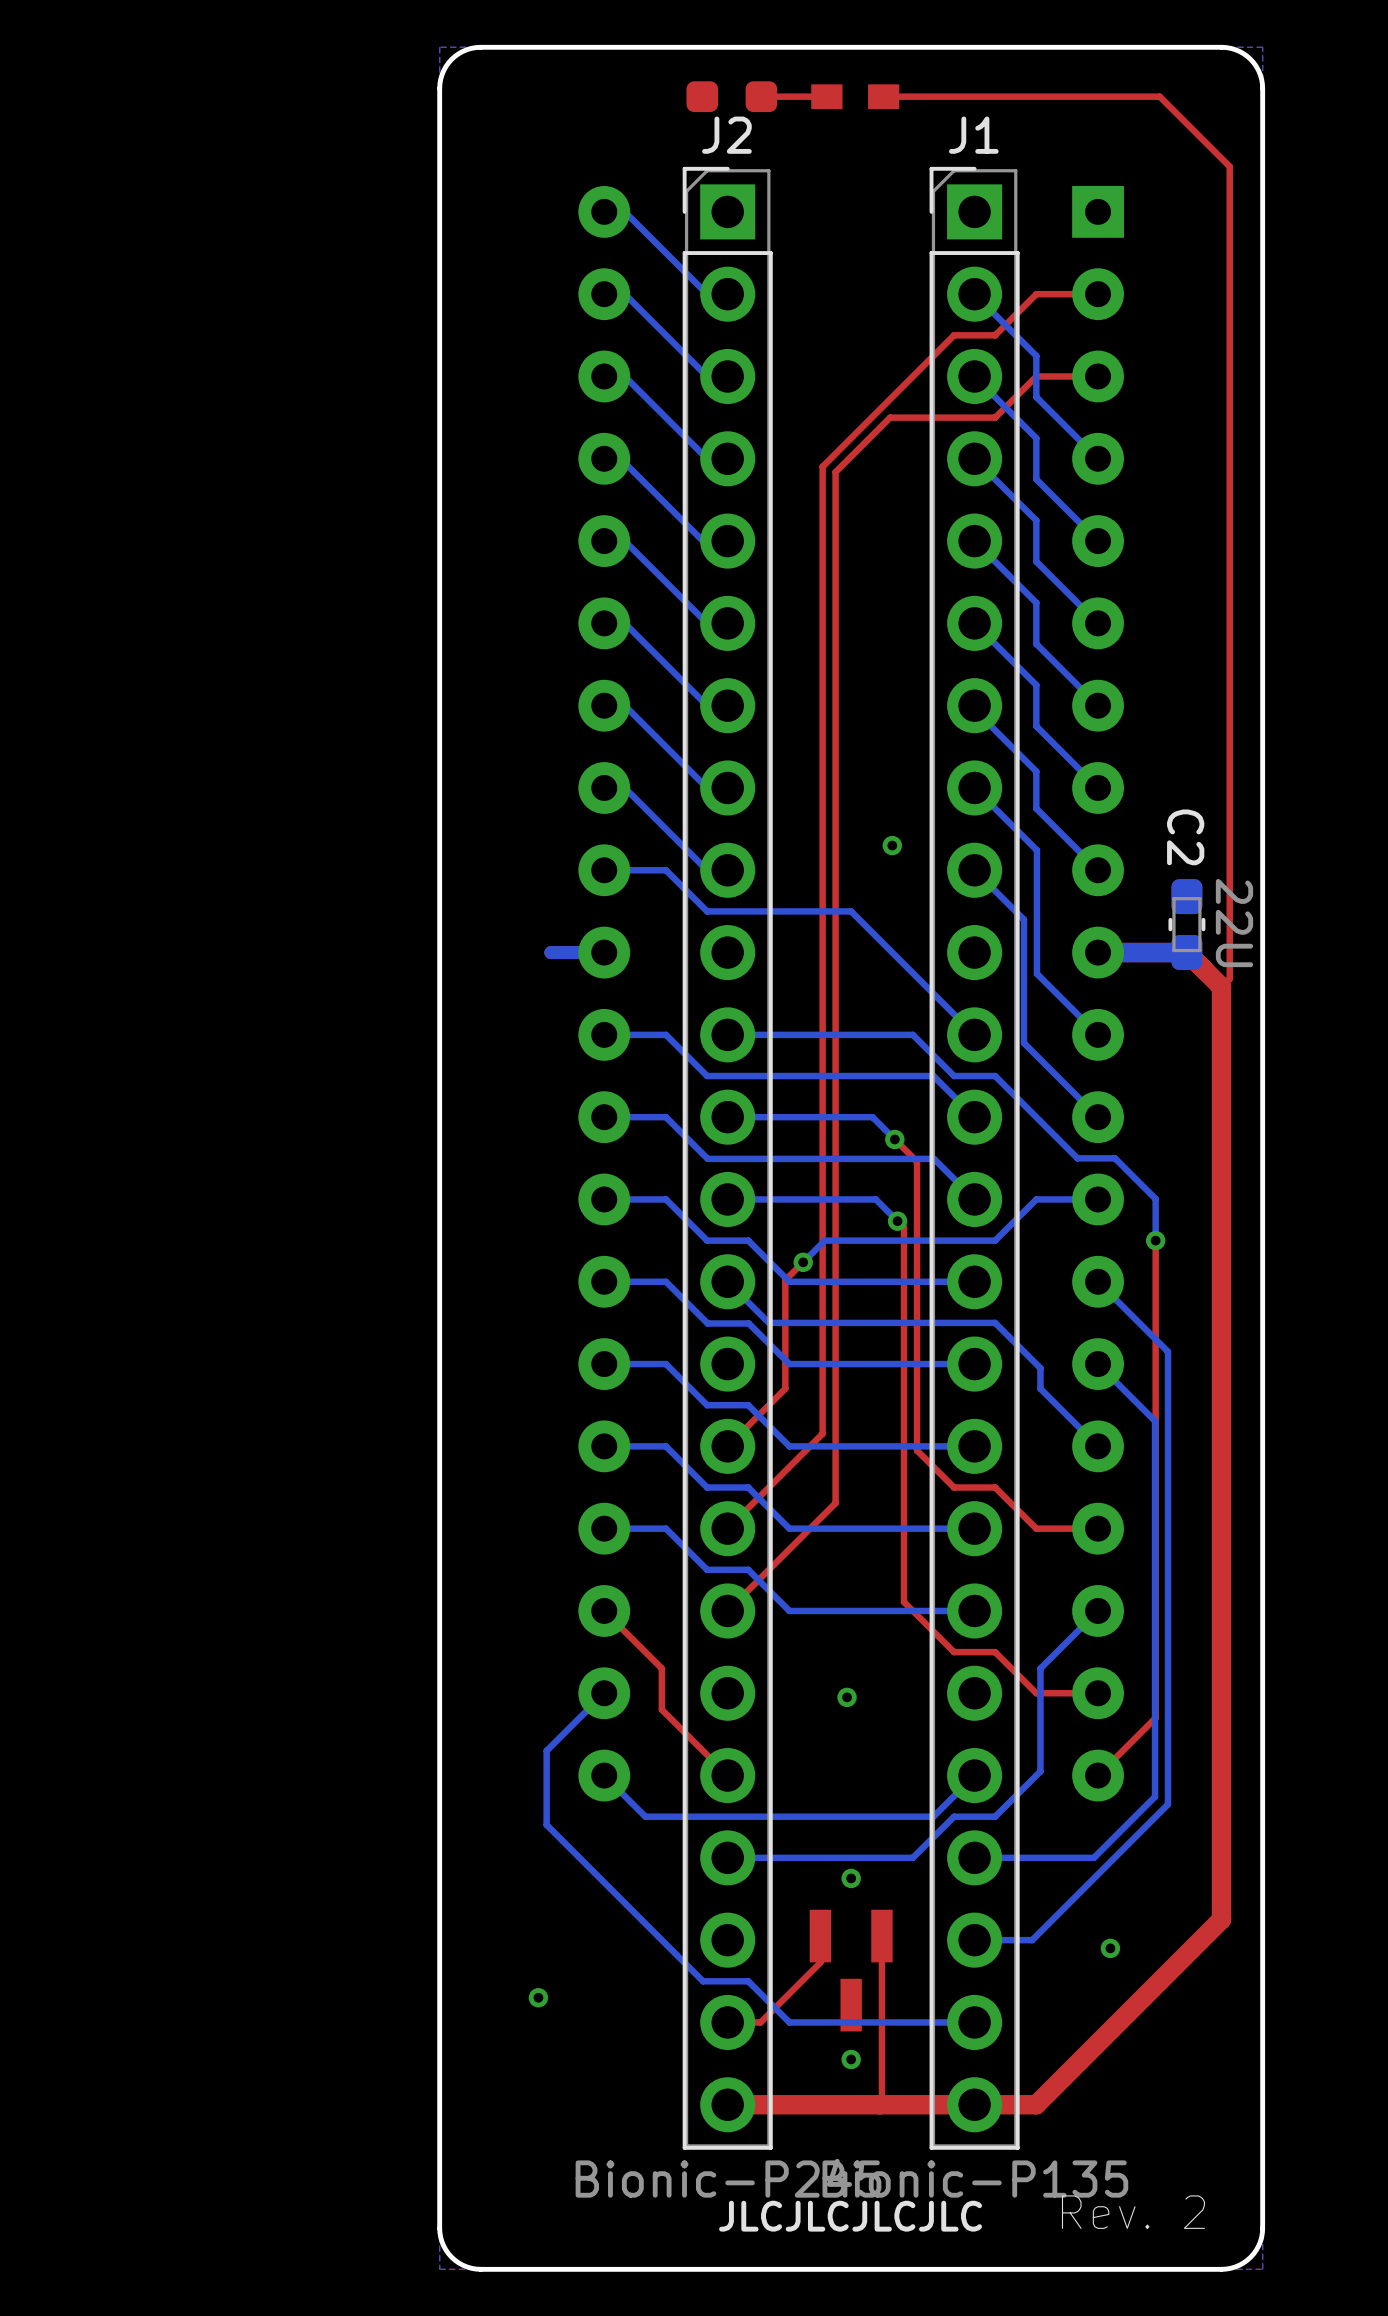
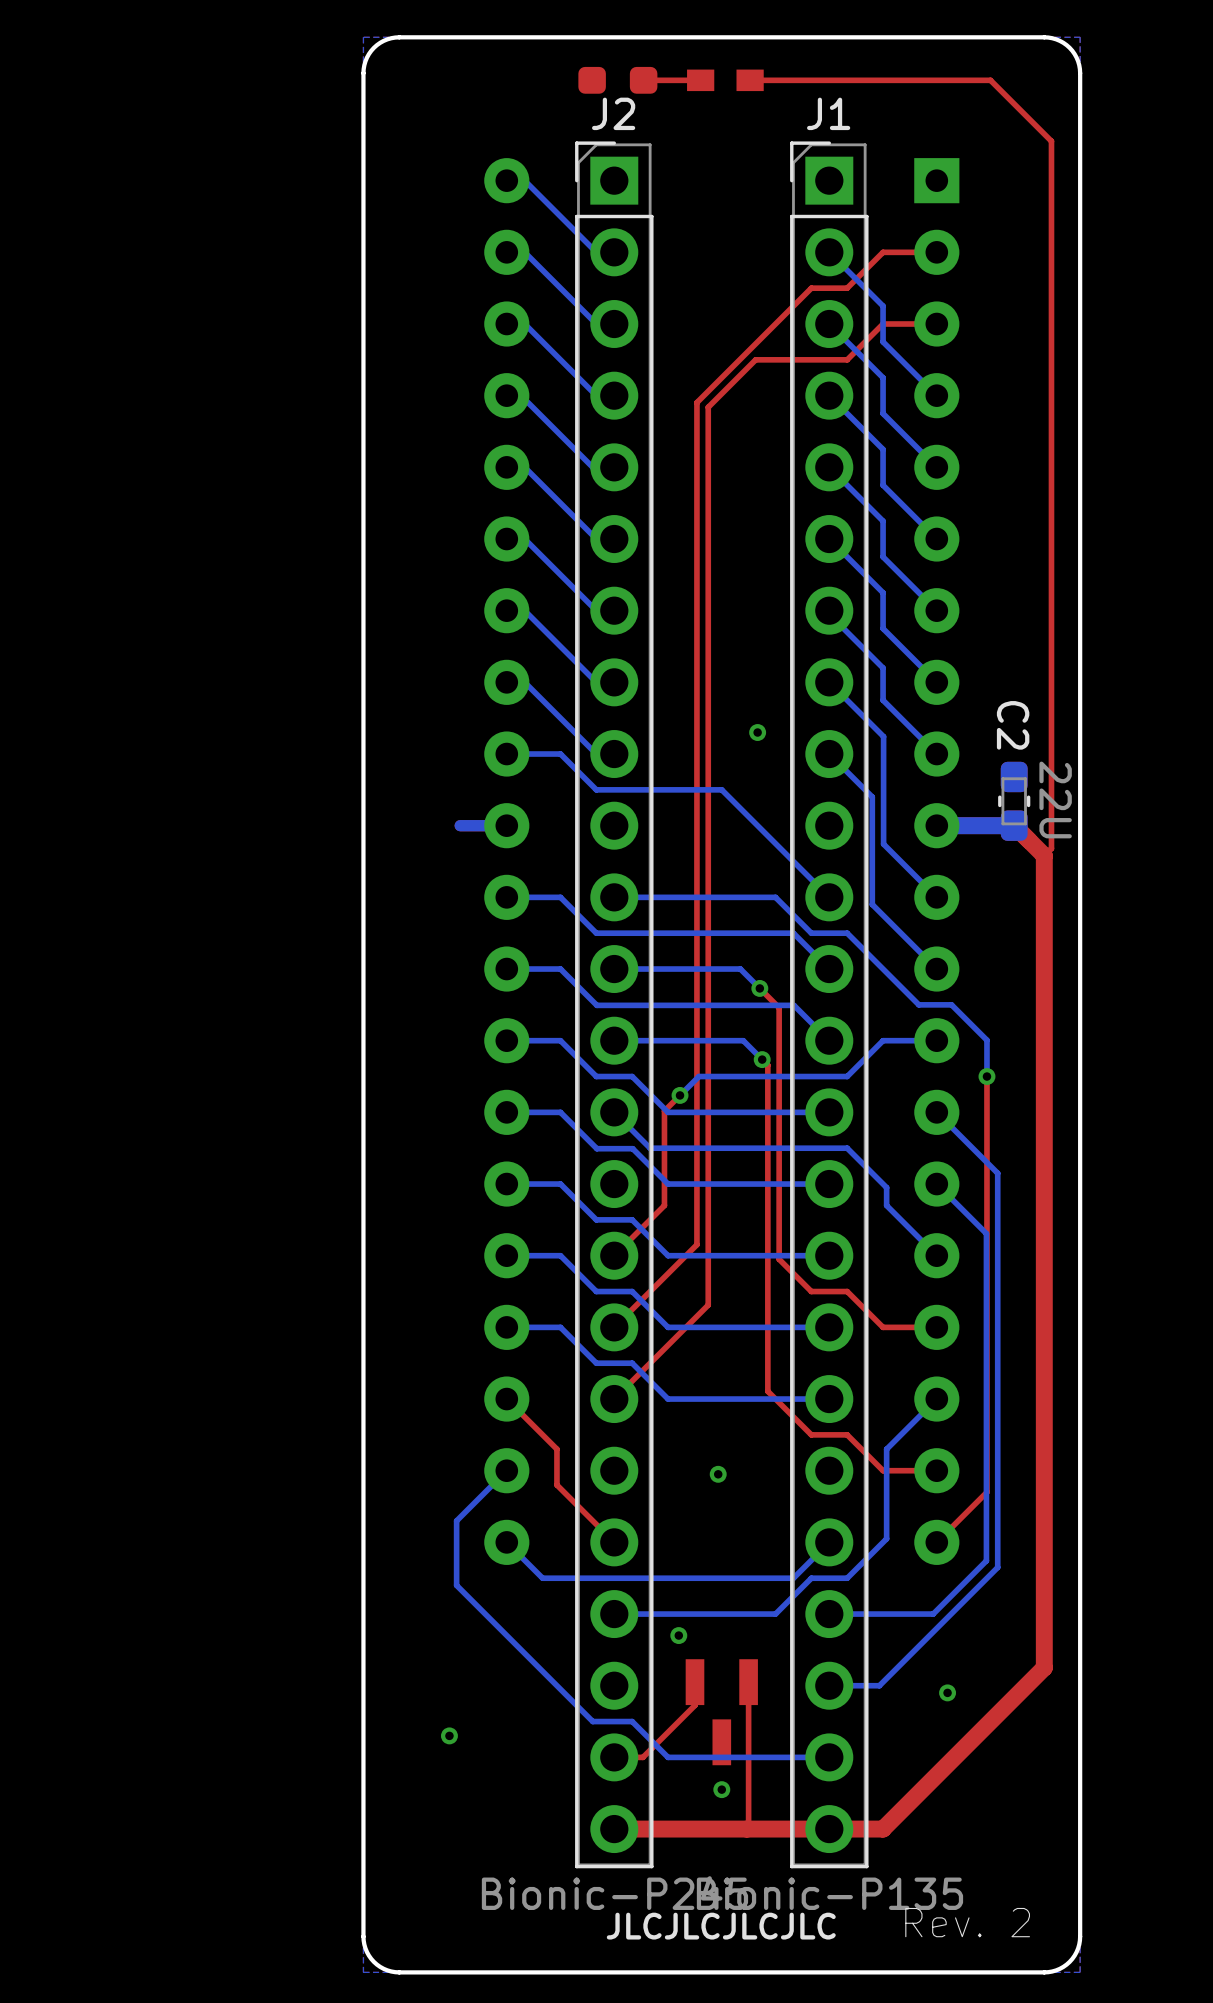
via position: (851, 1878) -> (678, 1635)

